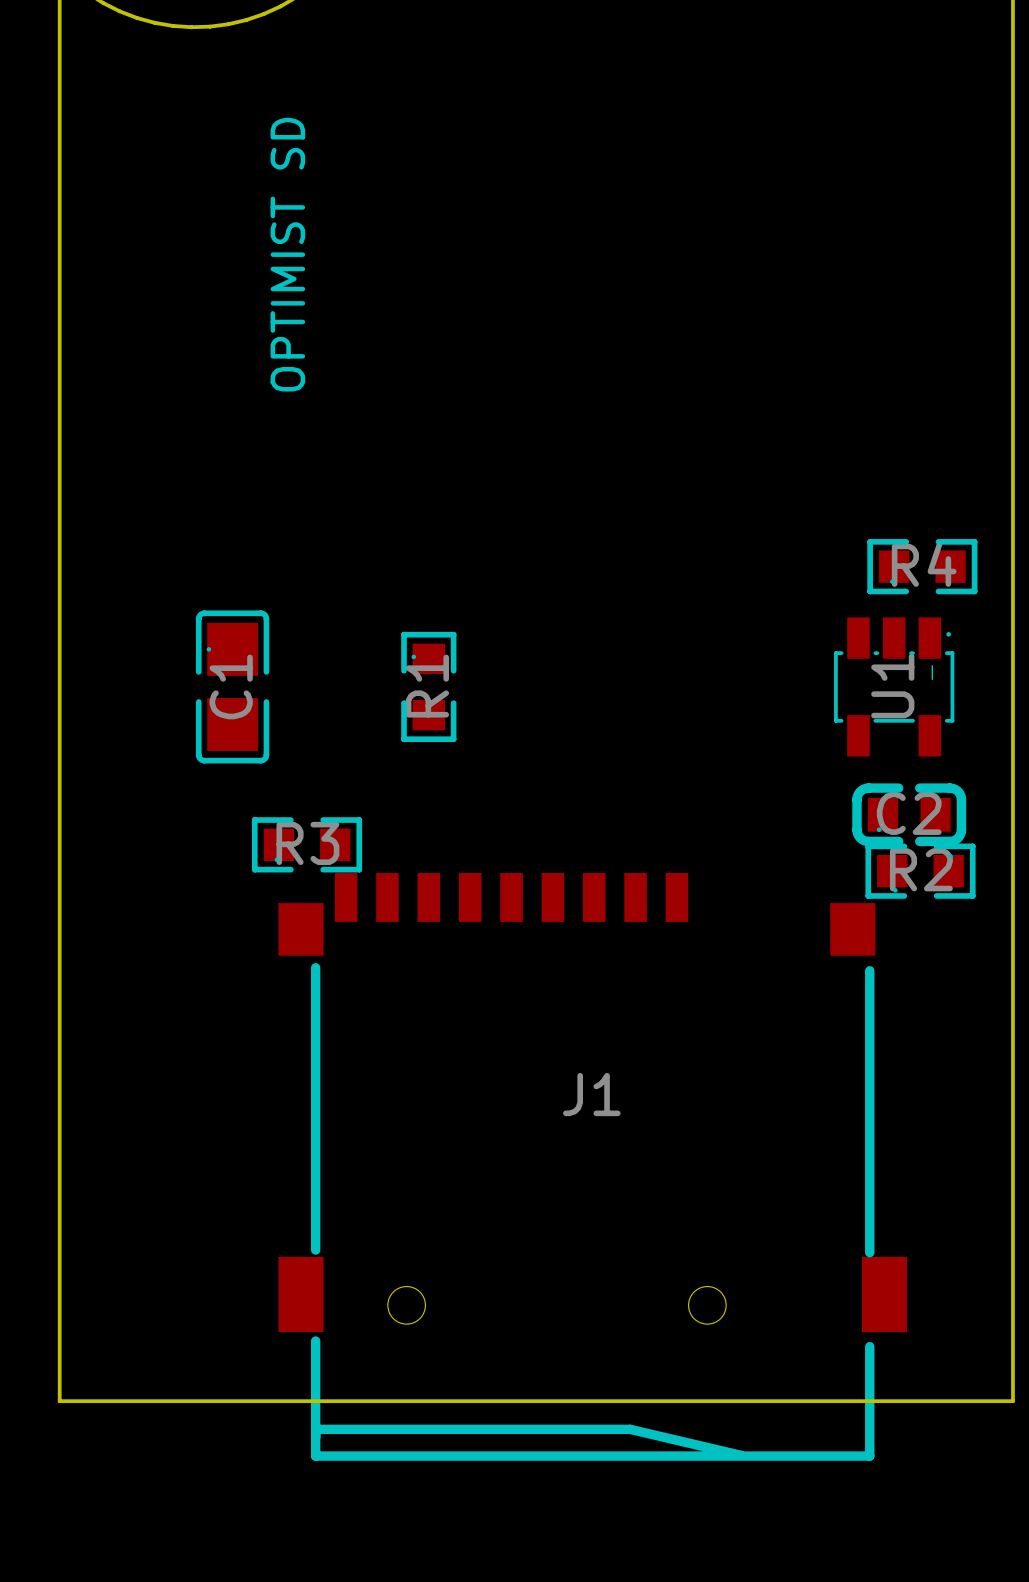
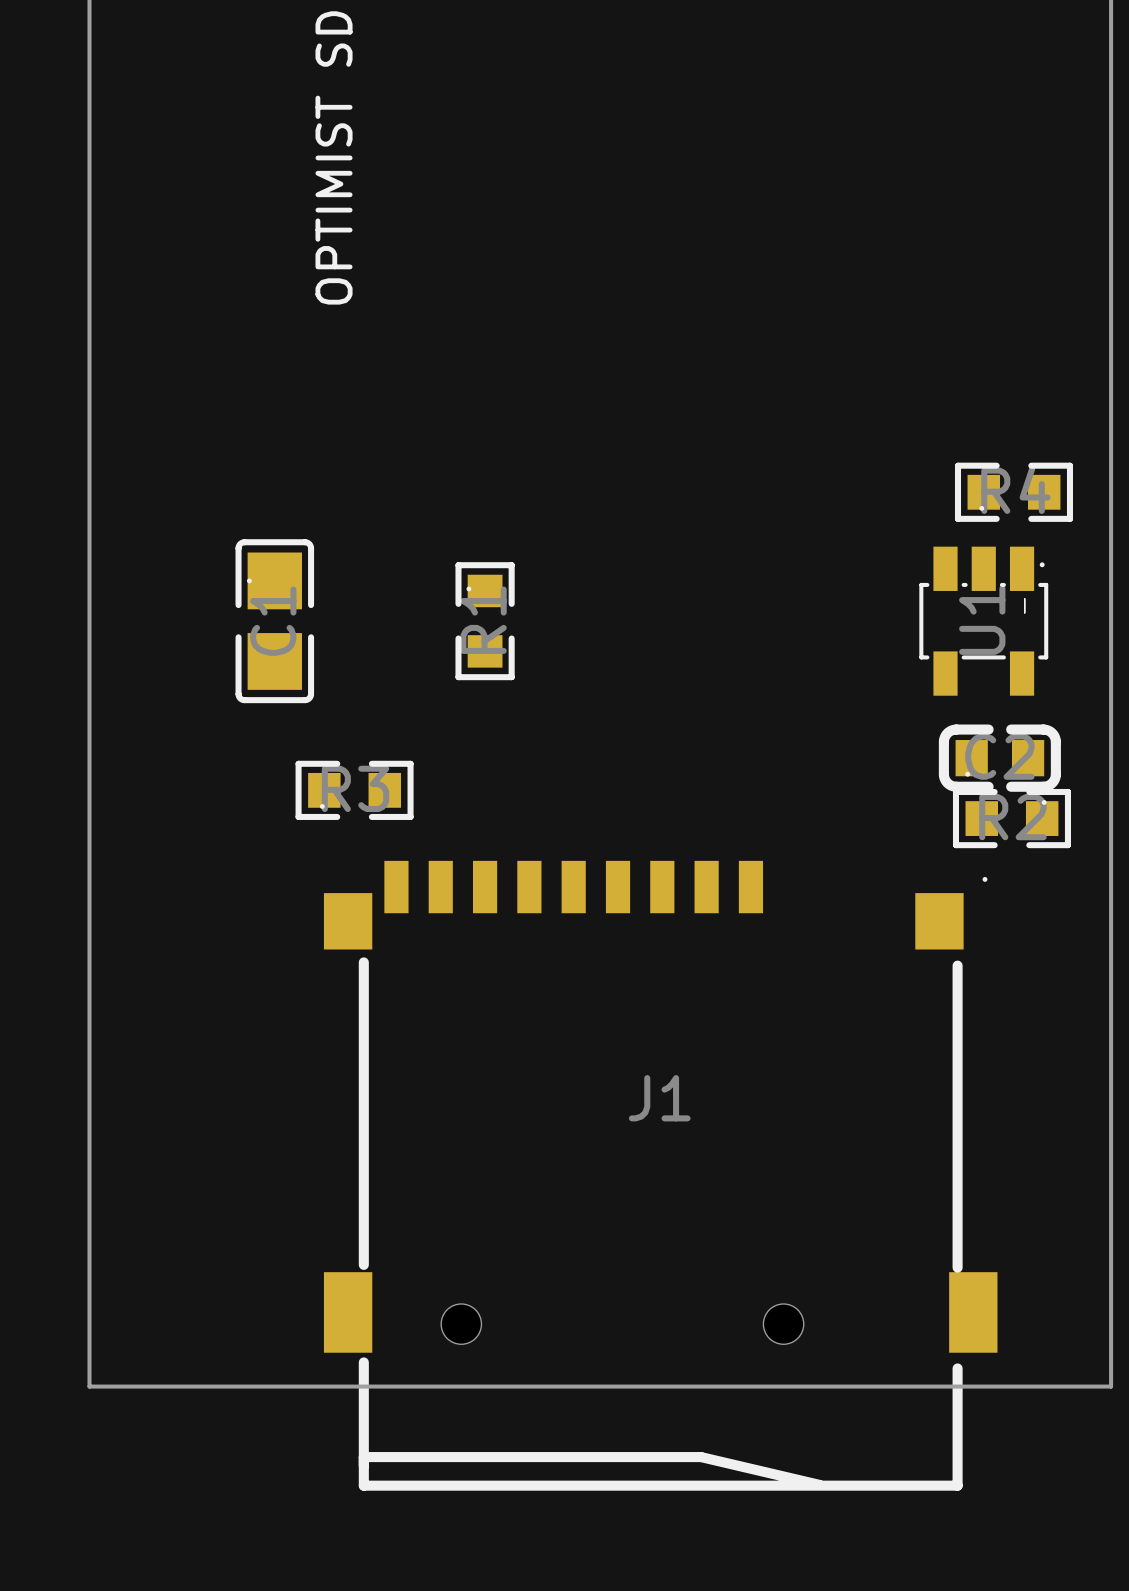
J1 position: (592, 1166) -> (660, 1175)

